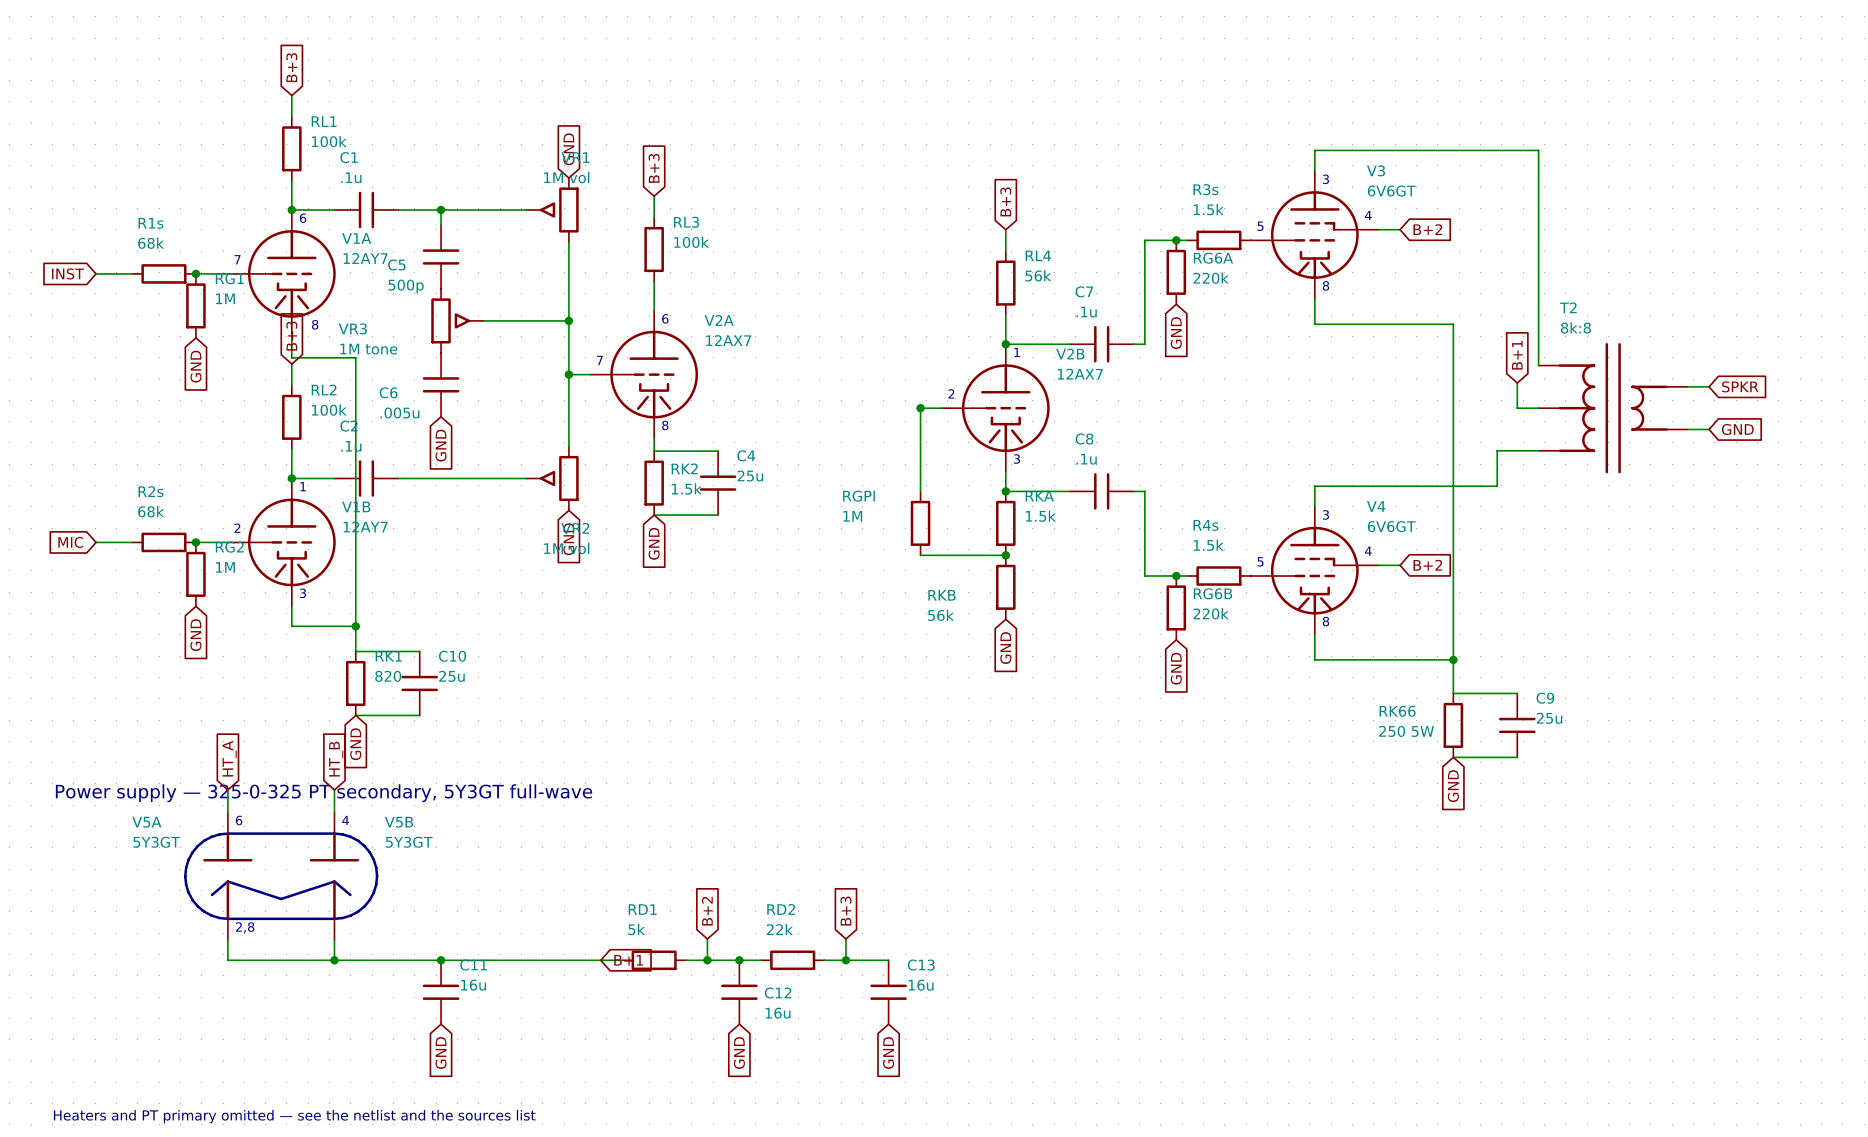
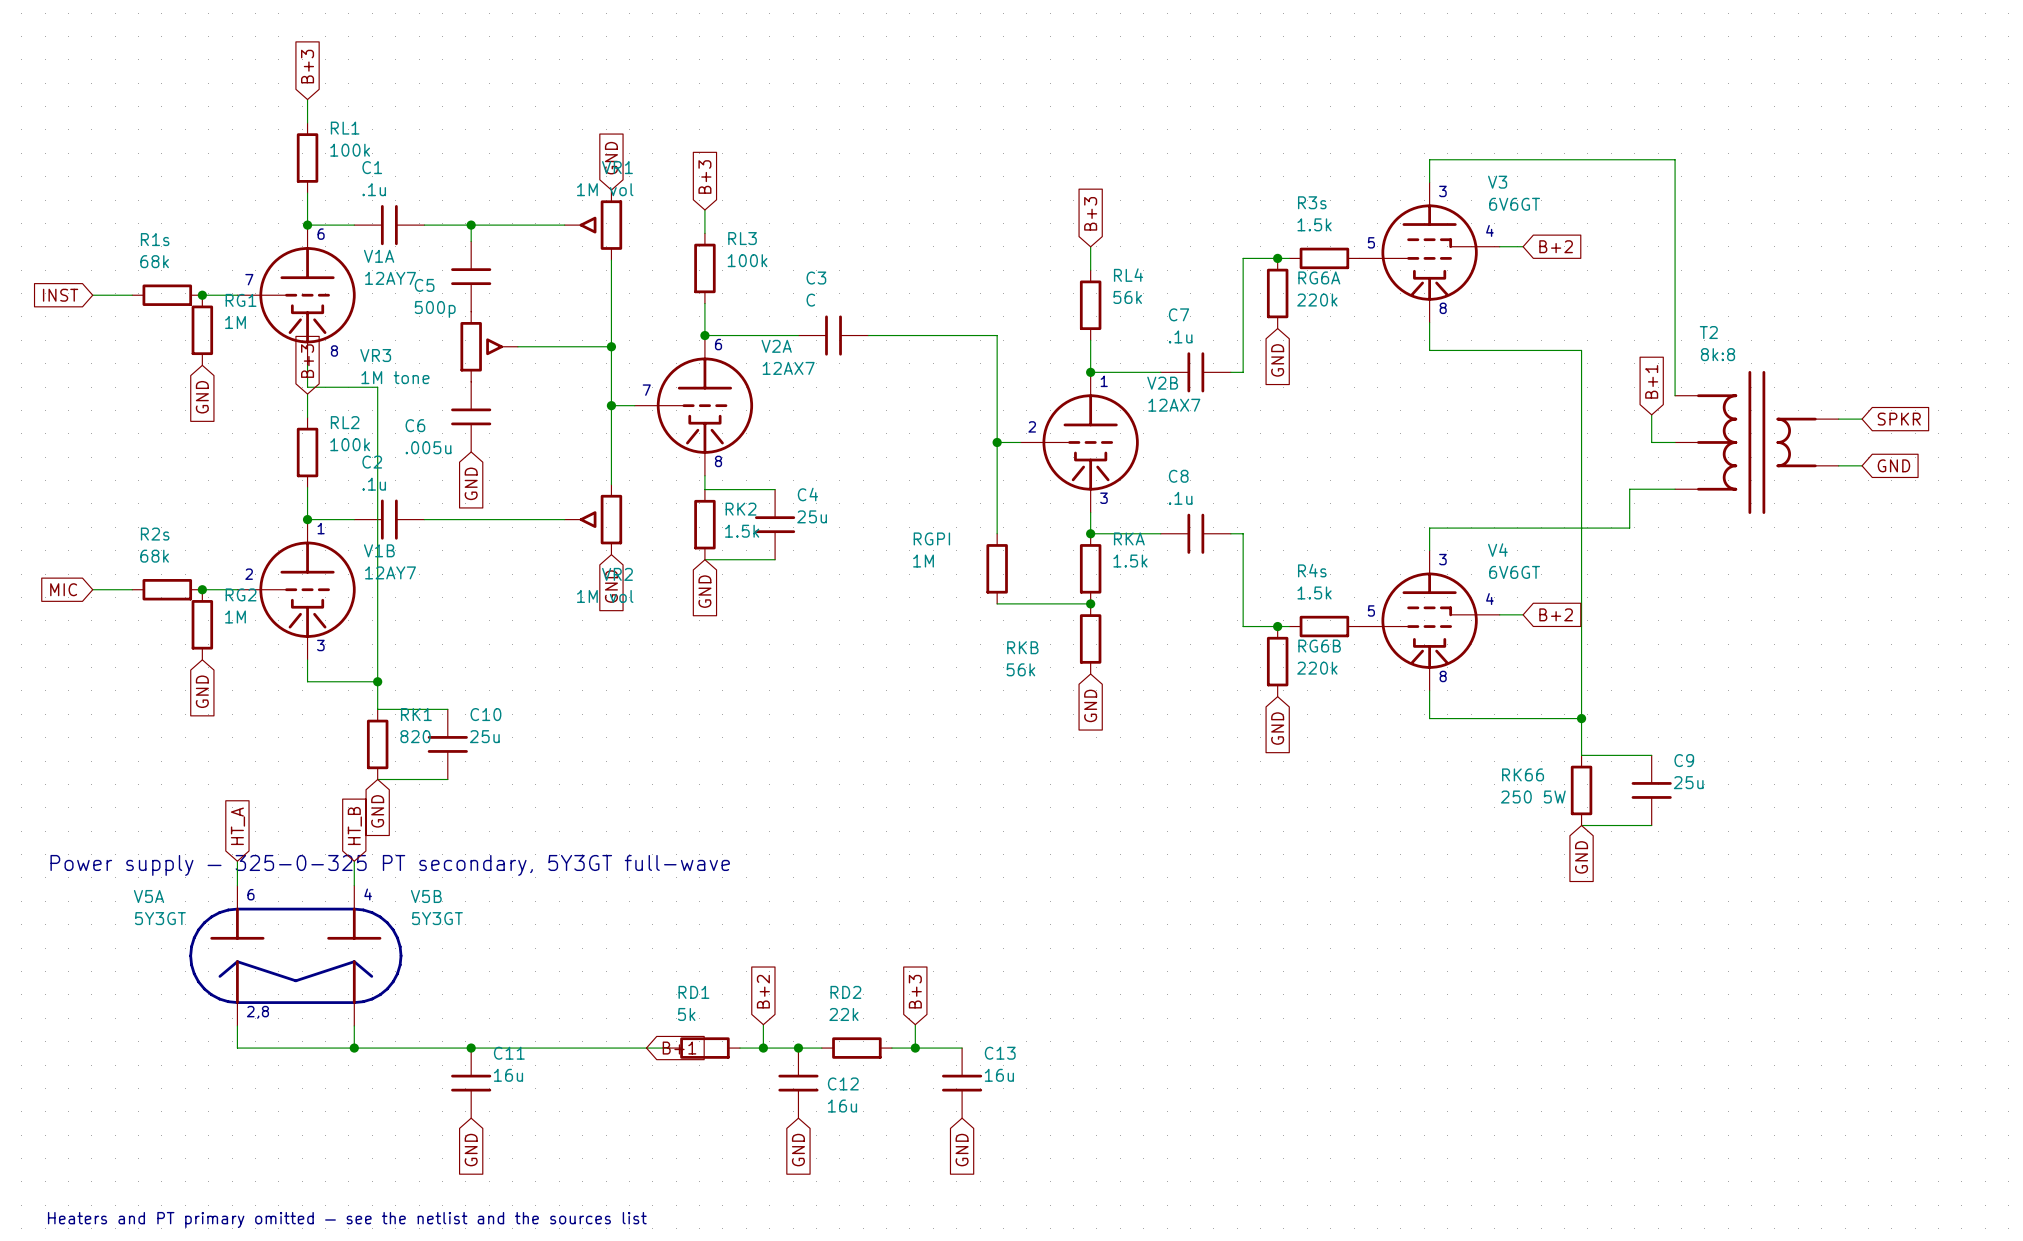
wire: none -> (704, 335) (798, 335)
junction: none -> (704, 335)
C3: none -> C (833, 335)
wire: none -> (868, 335) (997, 335) (997, 442)

